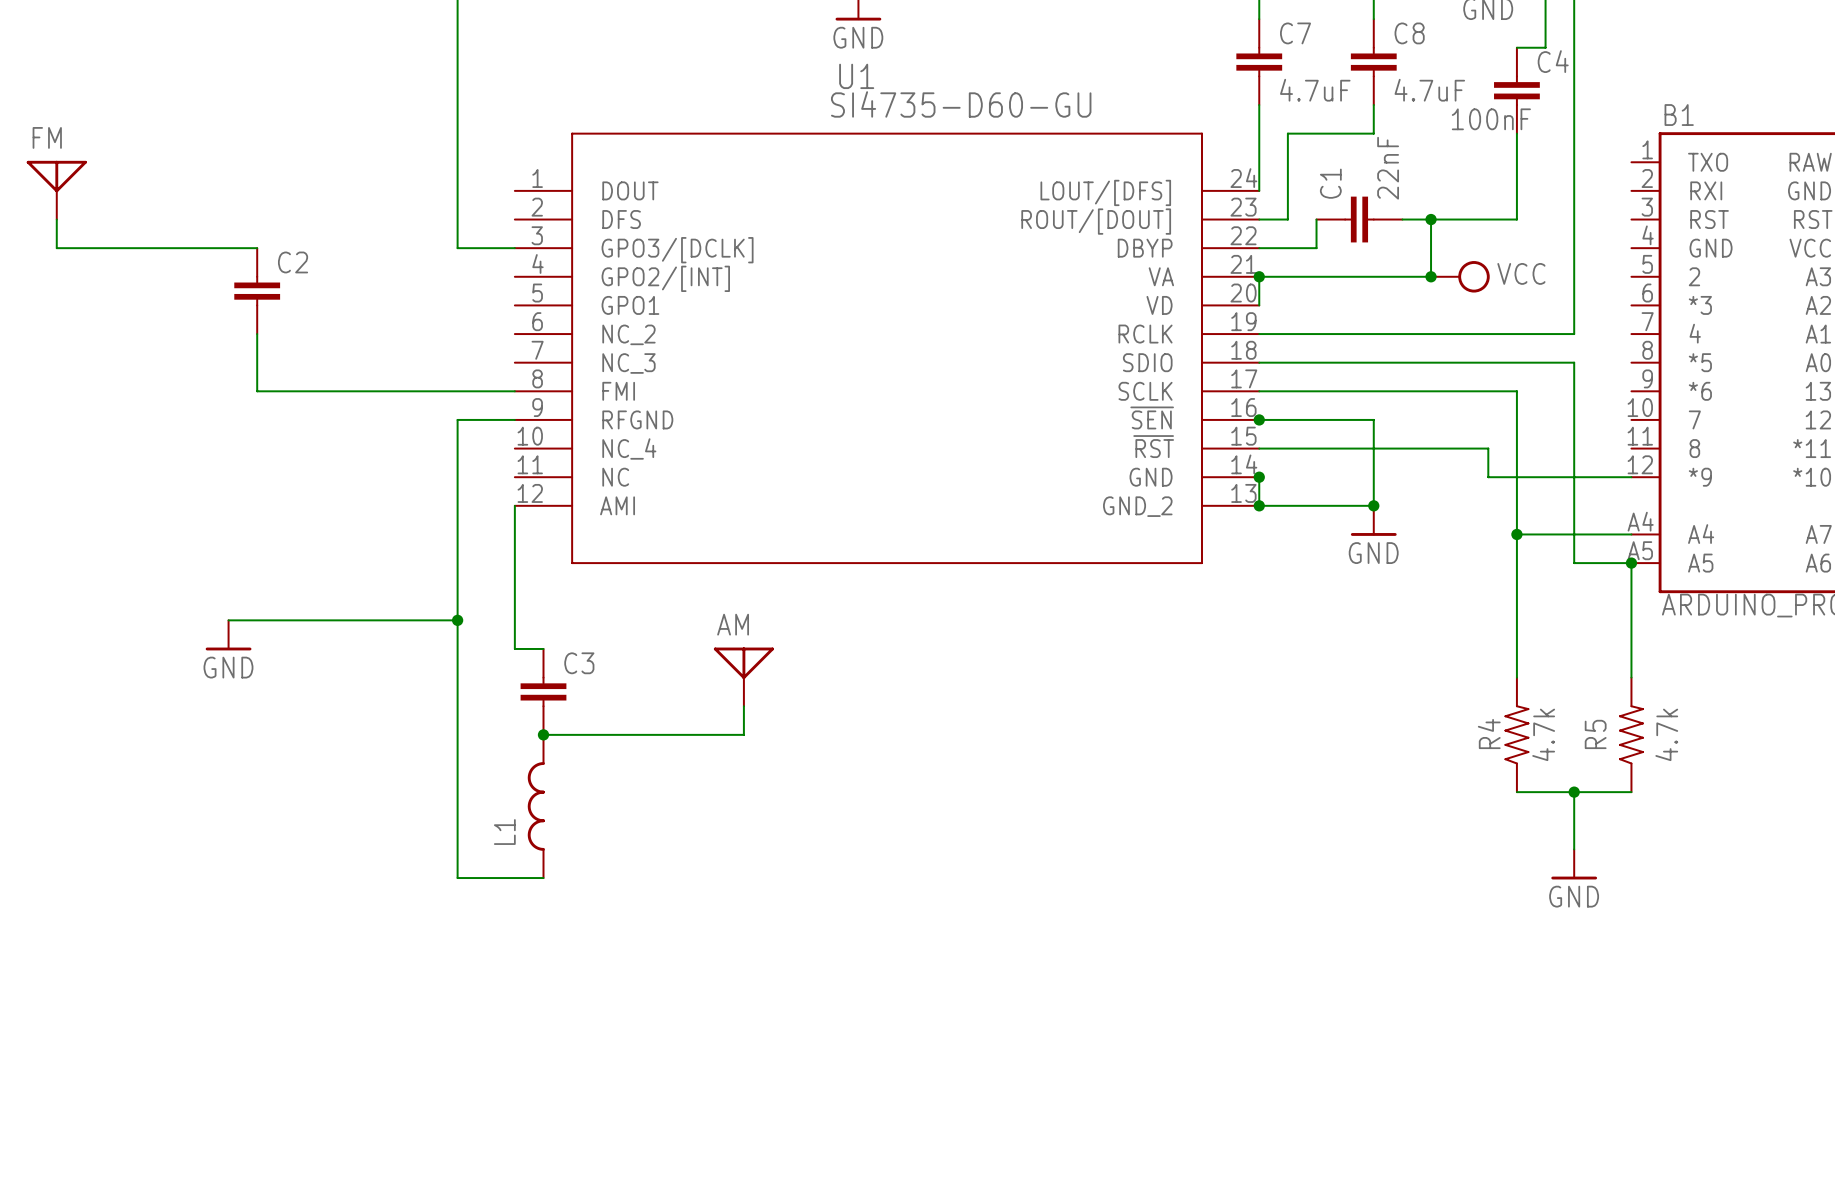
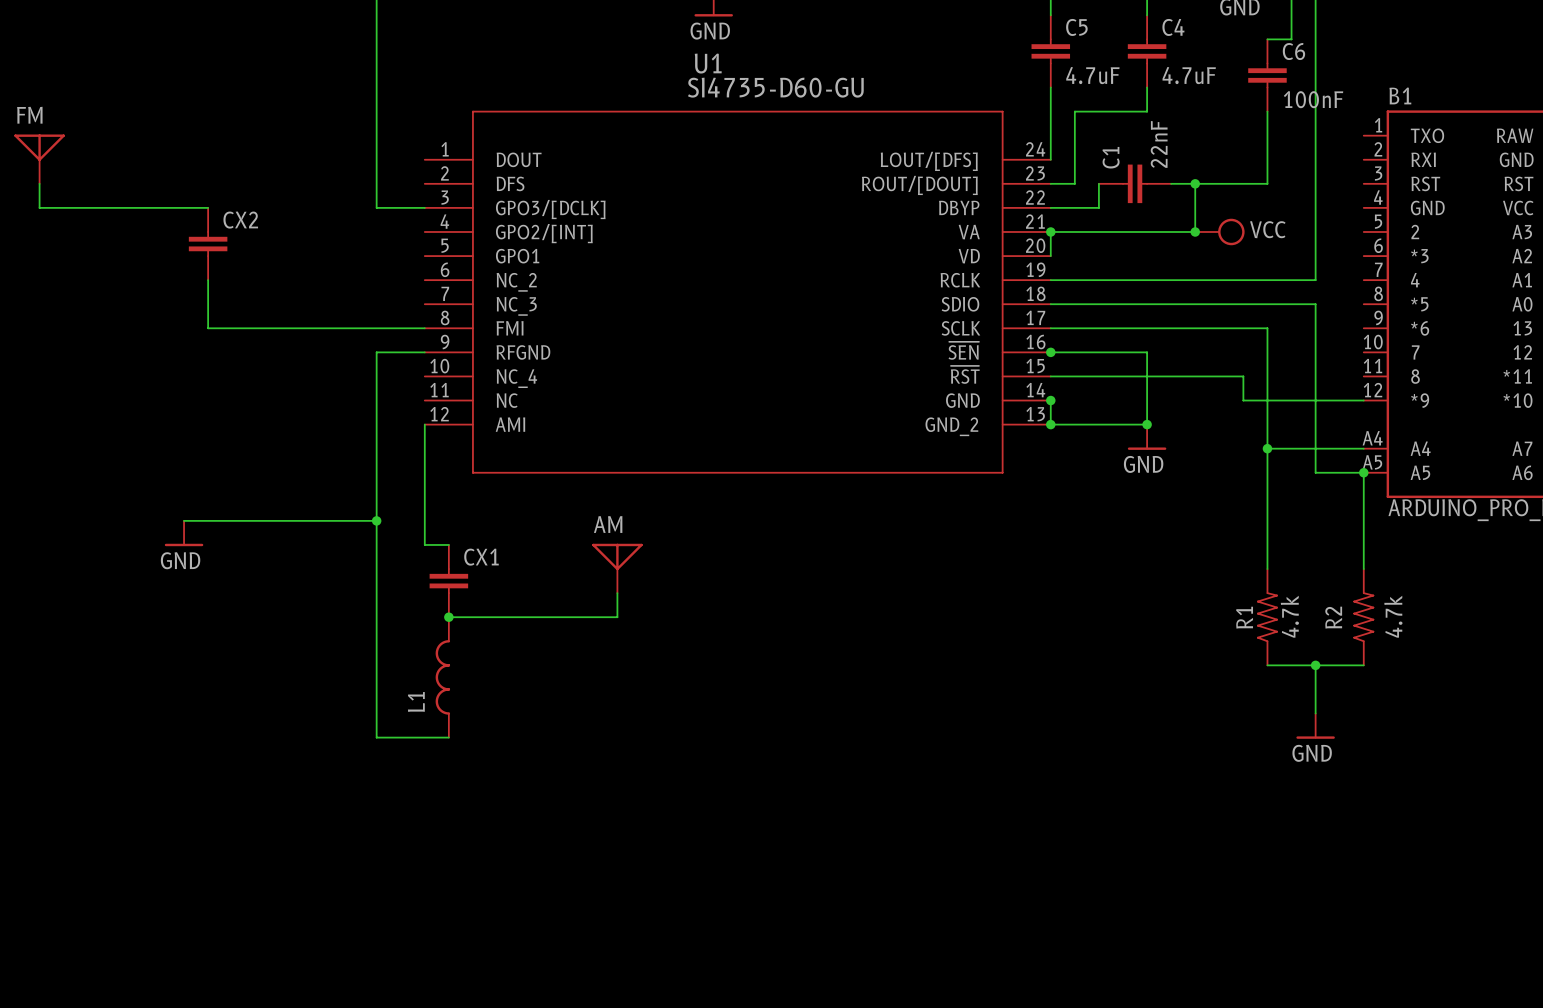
C7 name: C7 (1295, 33) -> C5 (1076, 27)
C8 name: C8 (1409, 33) -> C4 (1173, 27)
C4 name: C4 (1553, 61) -> C6 (1293, 51)
C4 value position: 100nF (1491, 119) -> 100nF (1313, 99)
C2 name: C2 (293, 262) -> CX2 (240, 220)
C3 name: C3 (579, 663) -> CX1 (481, 557)
R4 name: R4 (1489, 734) -> R1 (1244, 617)
R5 name: R5 (1595, 734) -> R2 (1333, 617)

